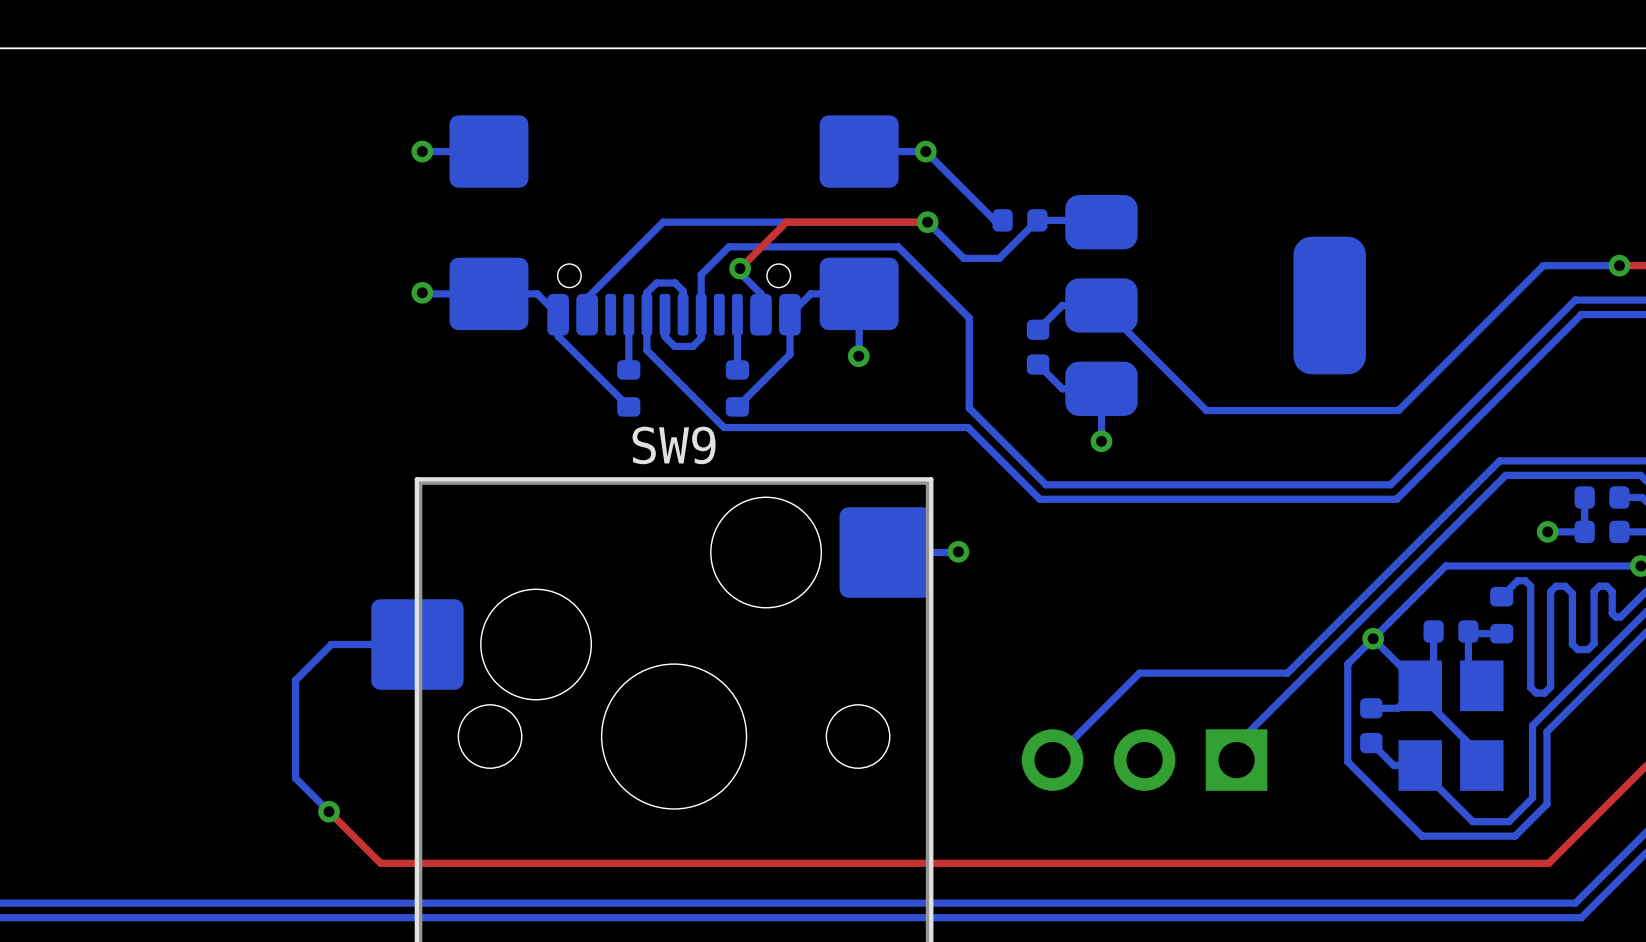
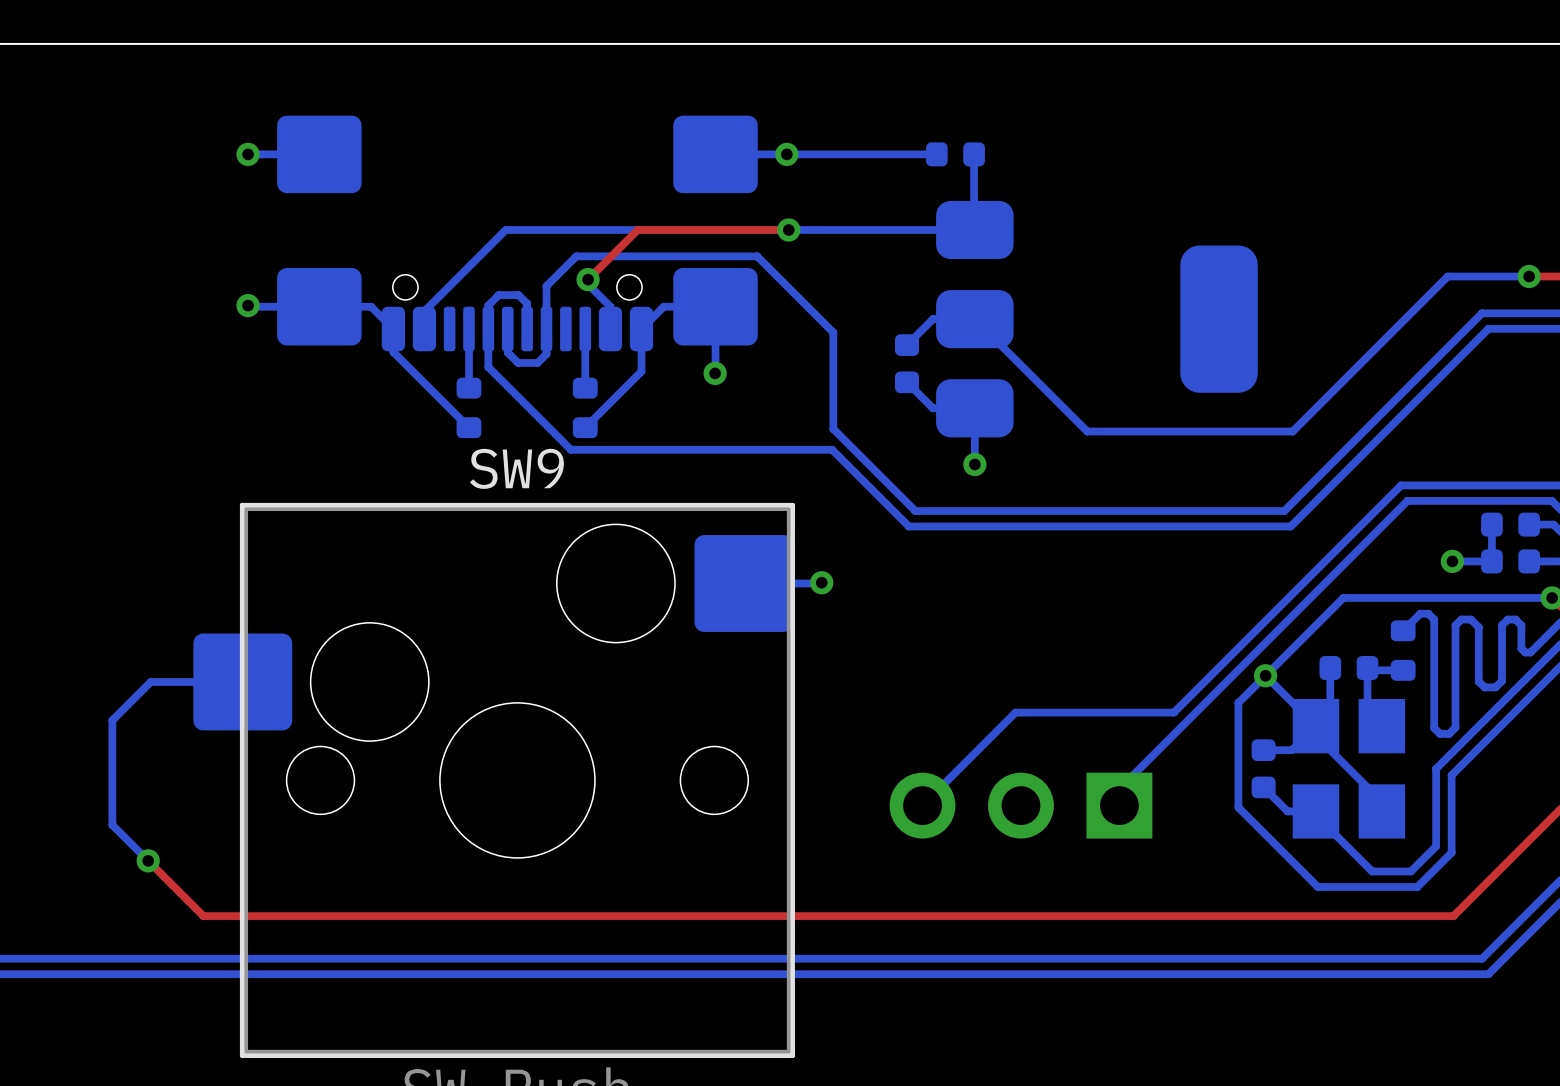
bottom track: (925, 151) (994, 220) (1002, 220) -> (786, 154) (936, 154)
bottom track: none -> (974, 154) (974, 229)
part position: (1019, 220) -> (955, 154)
bottom track: (1100, 221) (1037, 220) (999, 258) (963, 258) (927, 222) -> (974, 229) (788, 229)

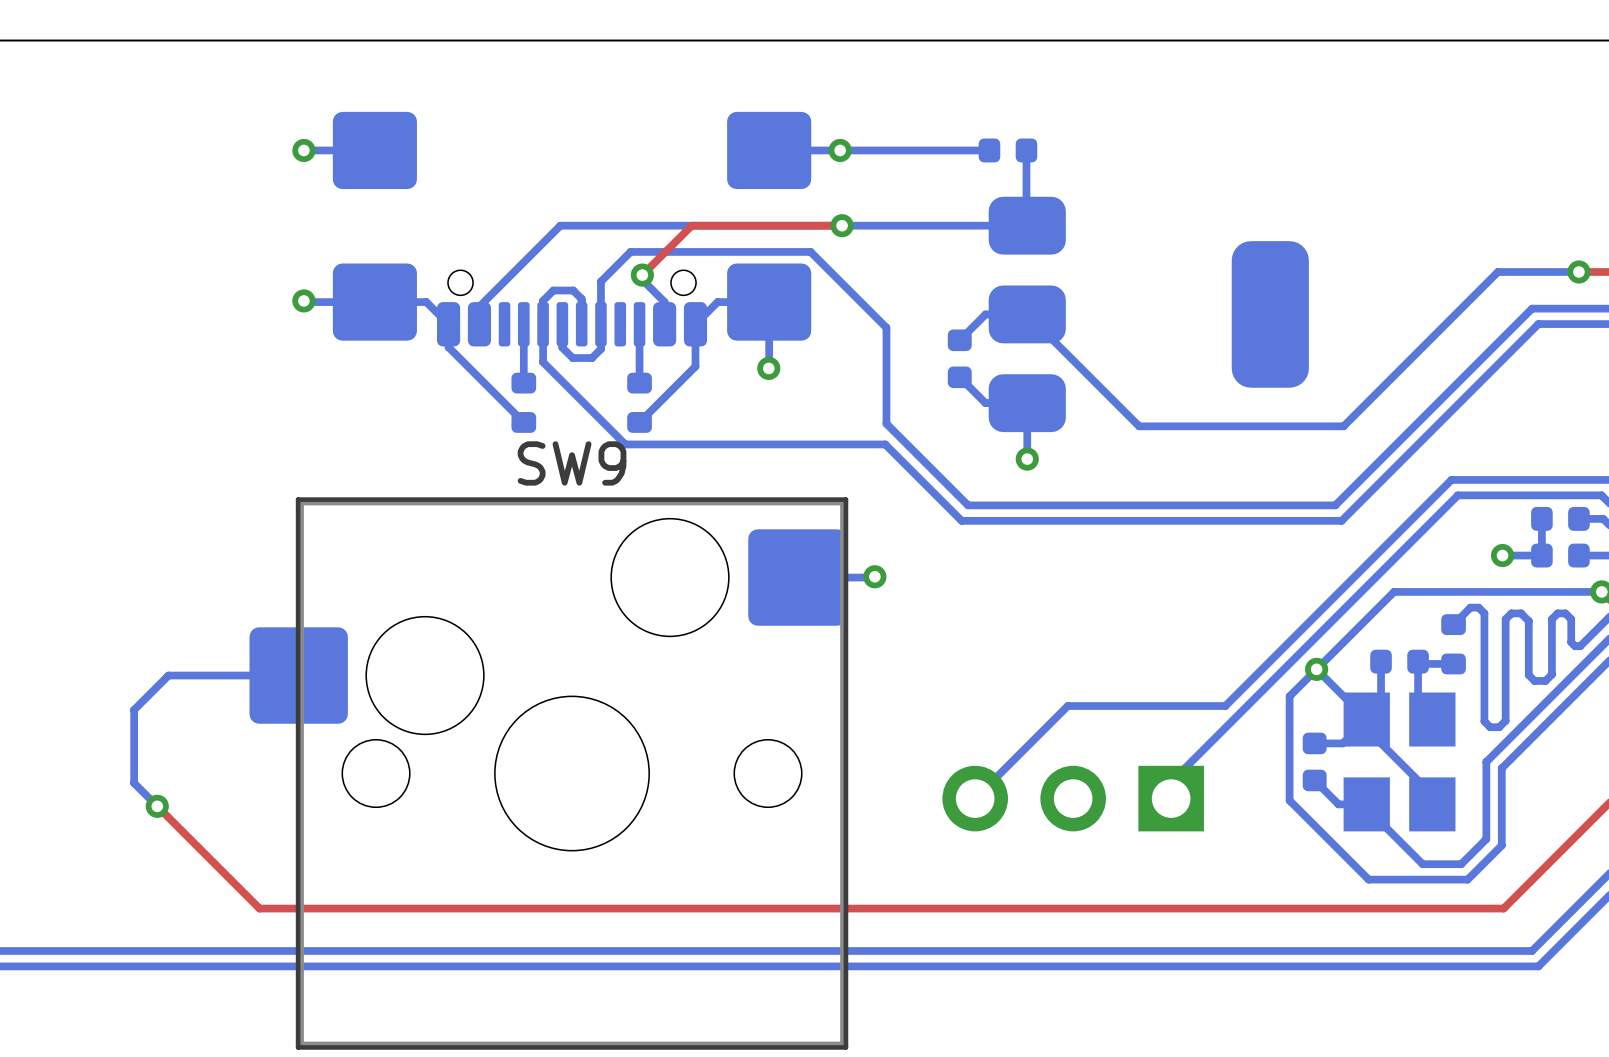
bottom track: (150, 681) (112, 720) (112, 824) (148, 860) -> (207, 675) (168, 675) (134, 709) (134, 783) (157, 806)
top track: none -> (157, 806) (204, 853)
via position: (148, 860) -> (157, 806)

